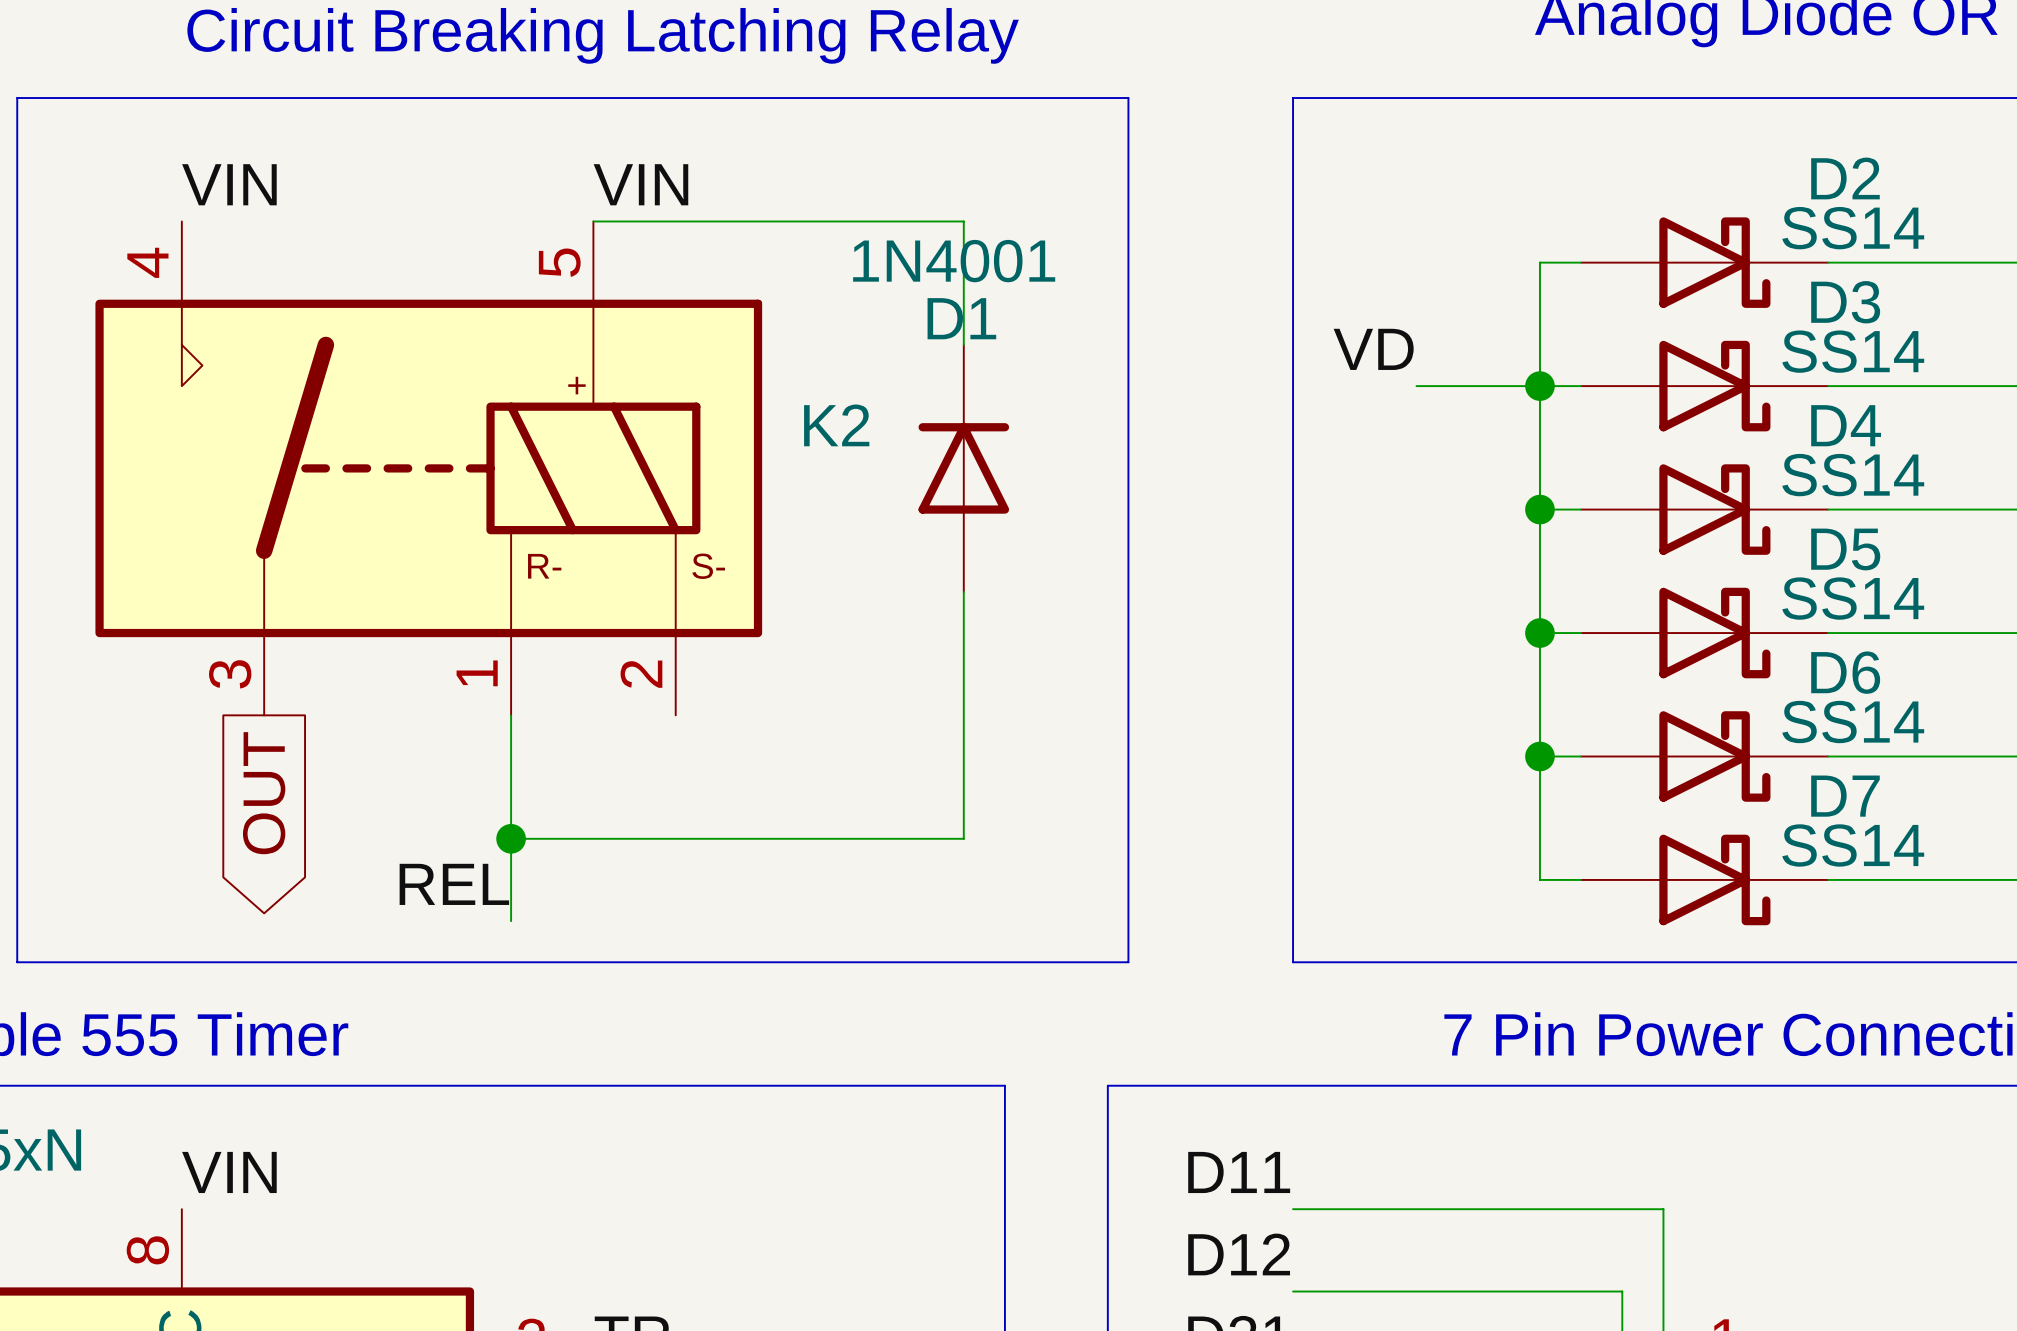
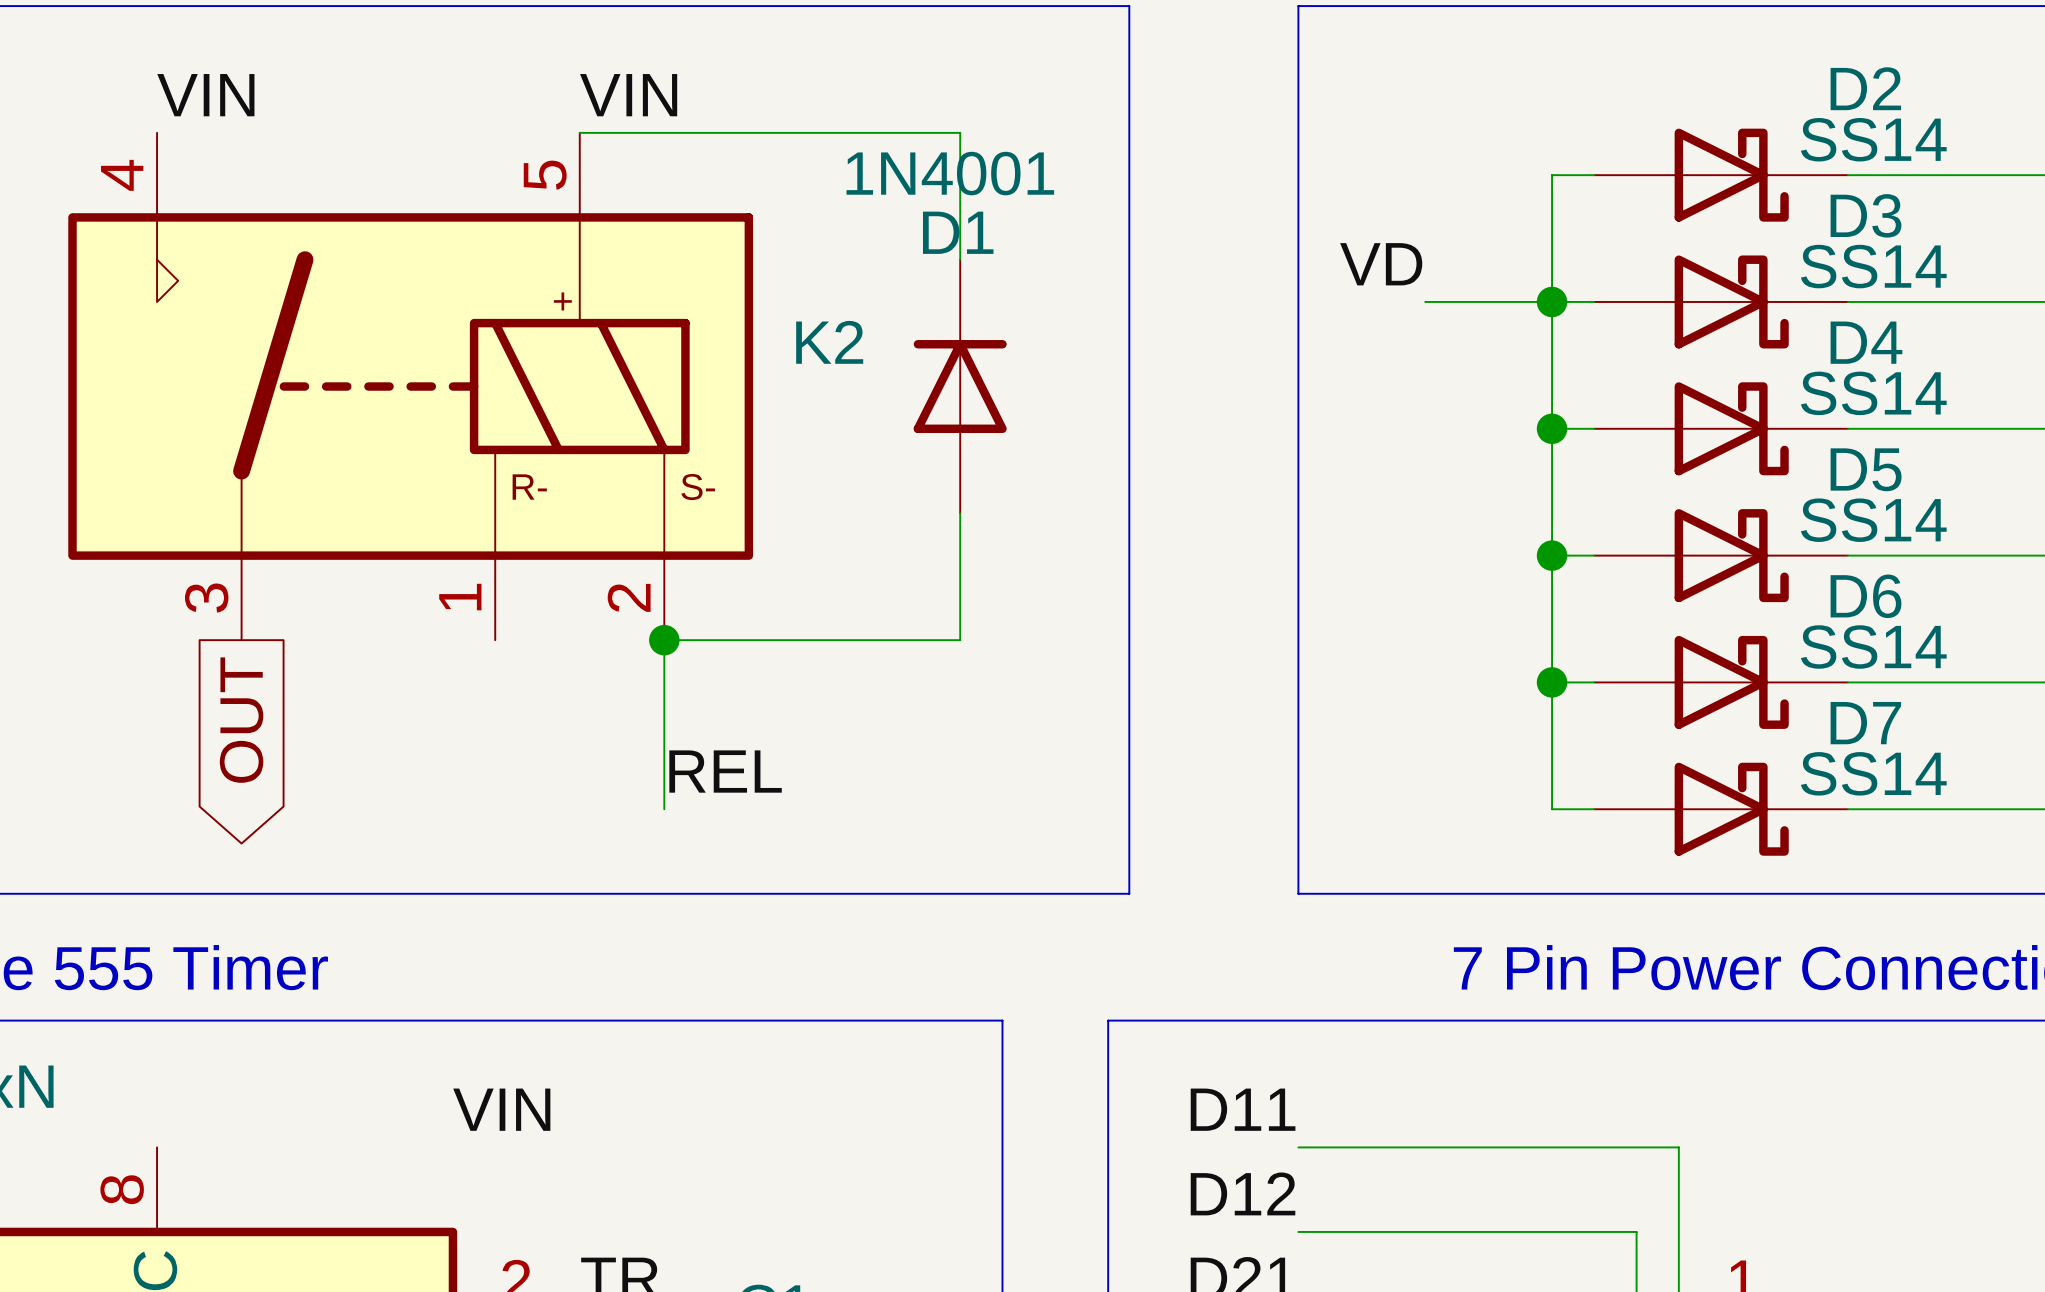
wire: (511, 715) (511, 921) -> none
junction: none -> (664, 640)
wire: (963, 715) (963, 838) (511, 838) -> (960, 640) (664, 640) (664, 809)
junction: (511, 838) -> none
label position: REL (454, 884) -> REL (725, 771)
label: VIN (229, 1172) -> none
label: none -> VIN (501, 1109)

